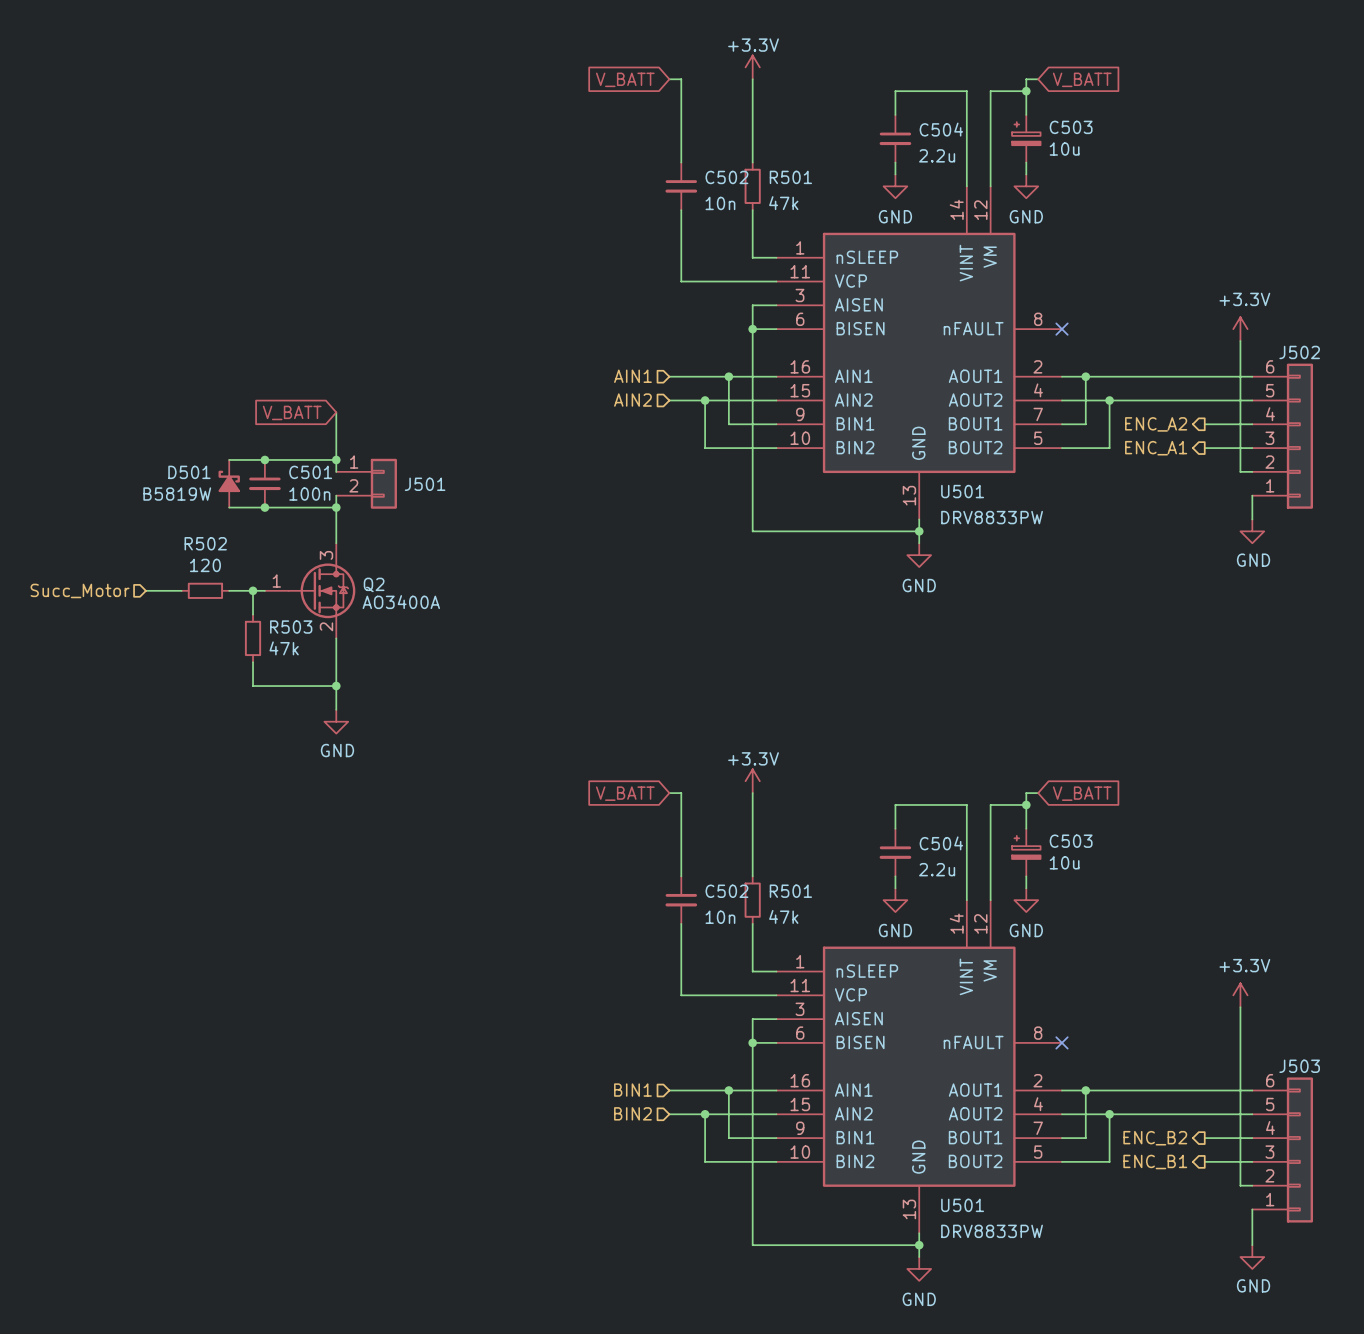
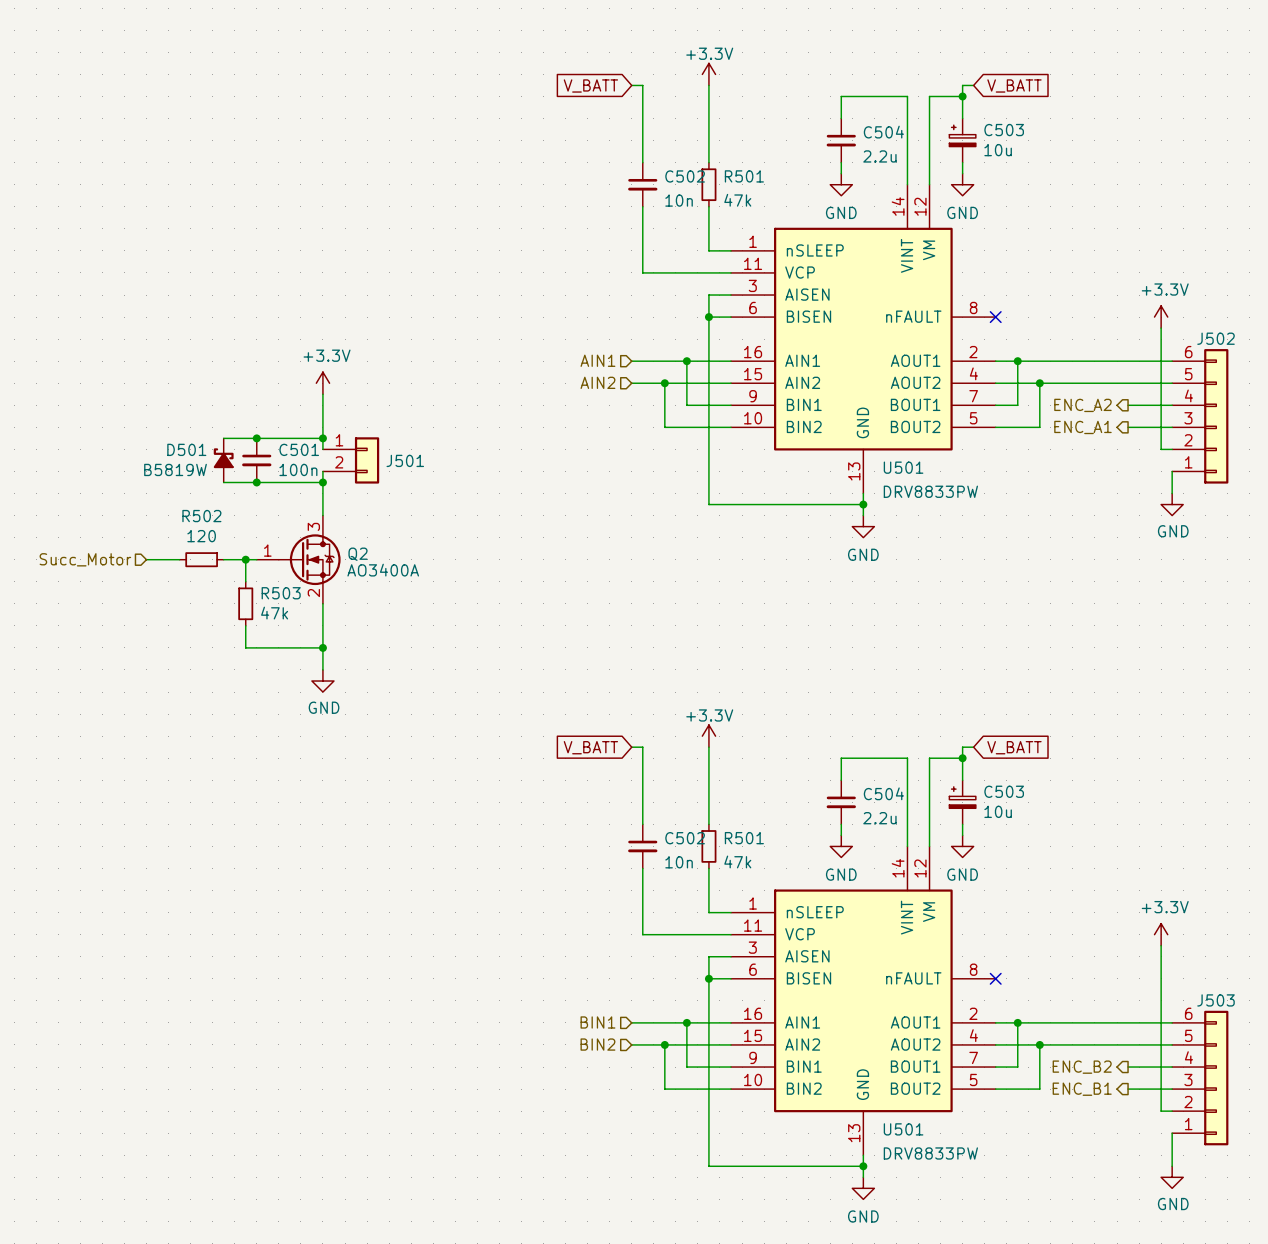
power symbol: none -> +3.3V (322, 383)
global label: V_BATT (292, 412) -> none

